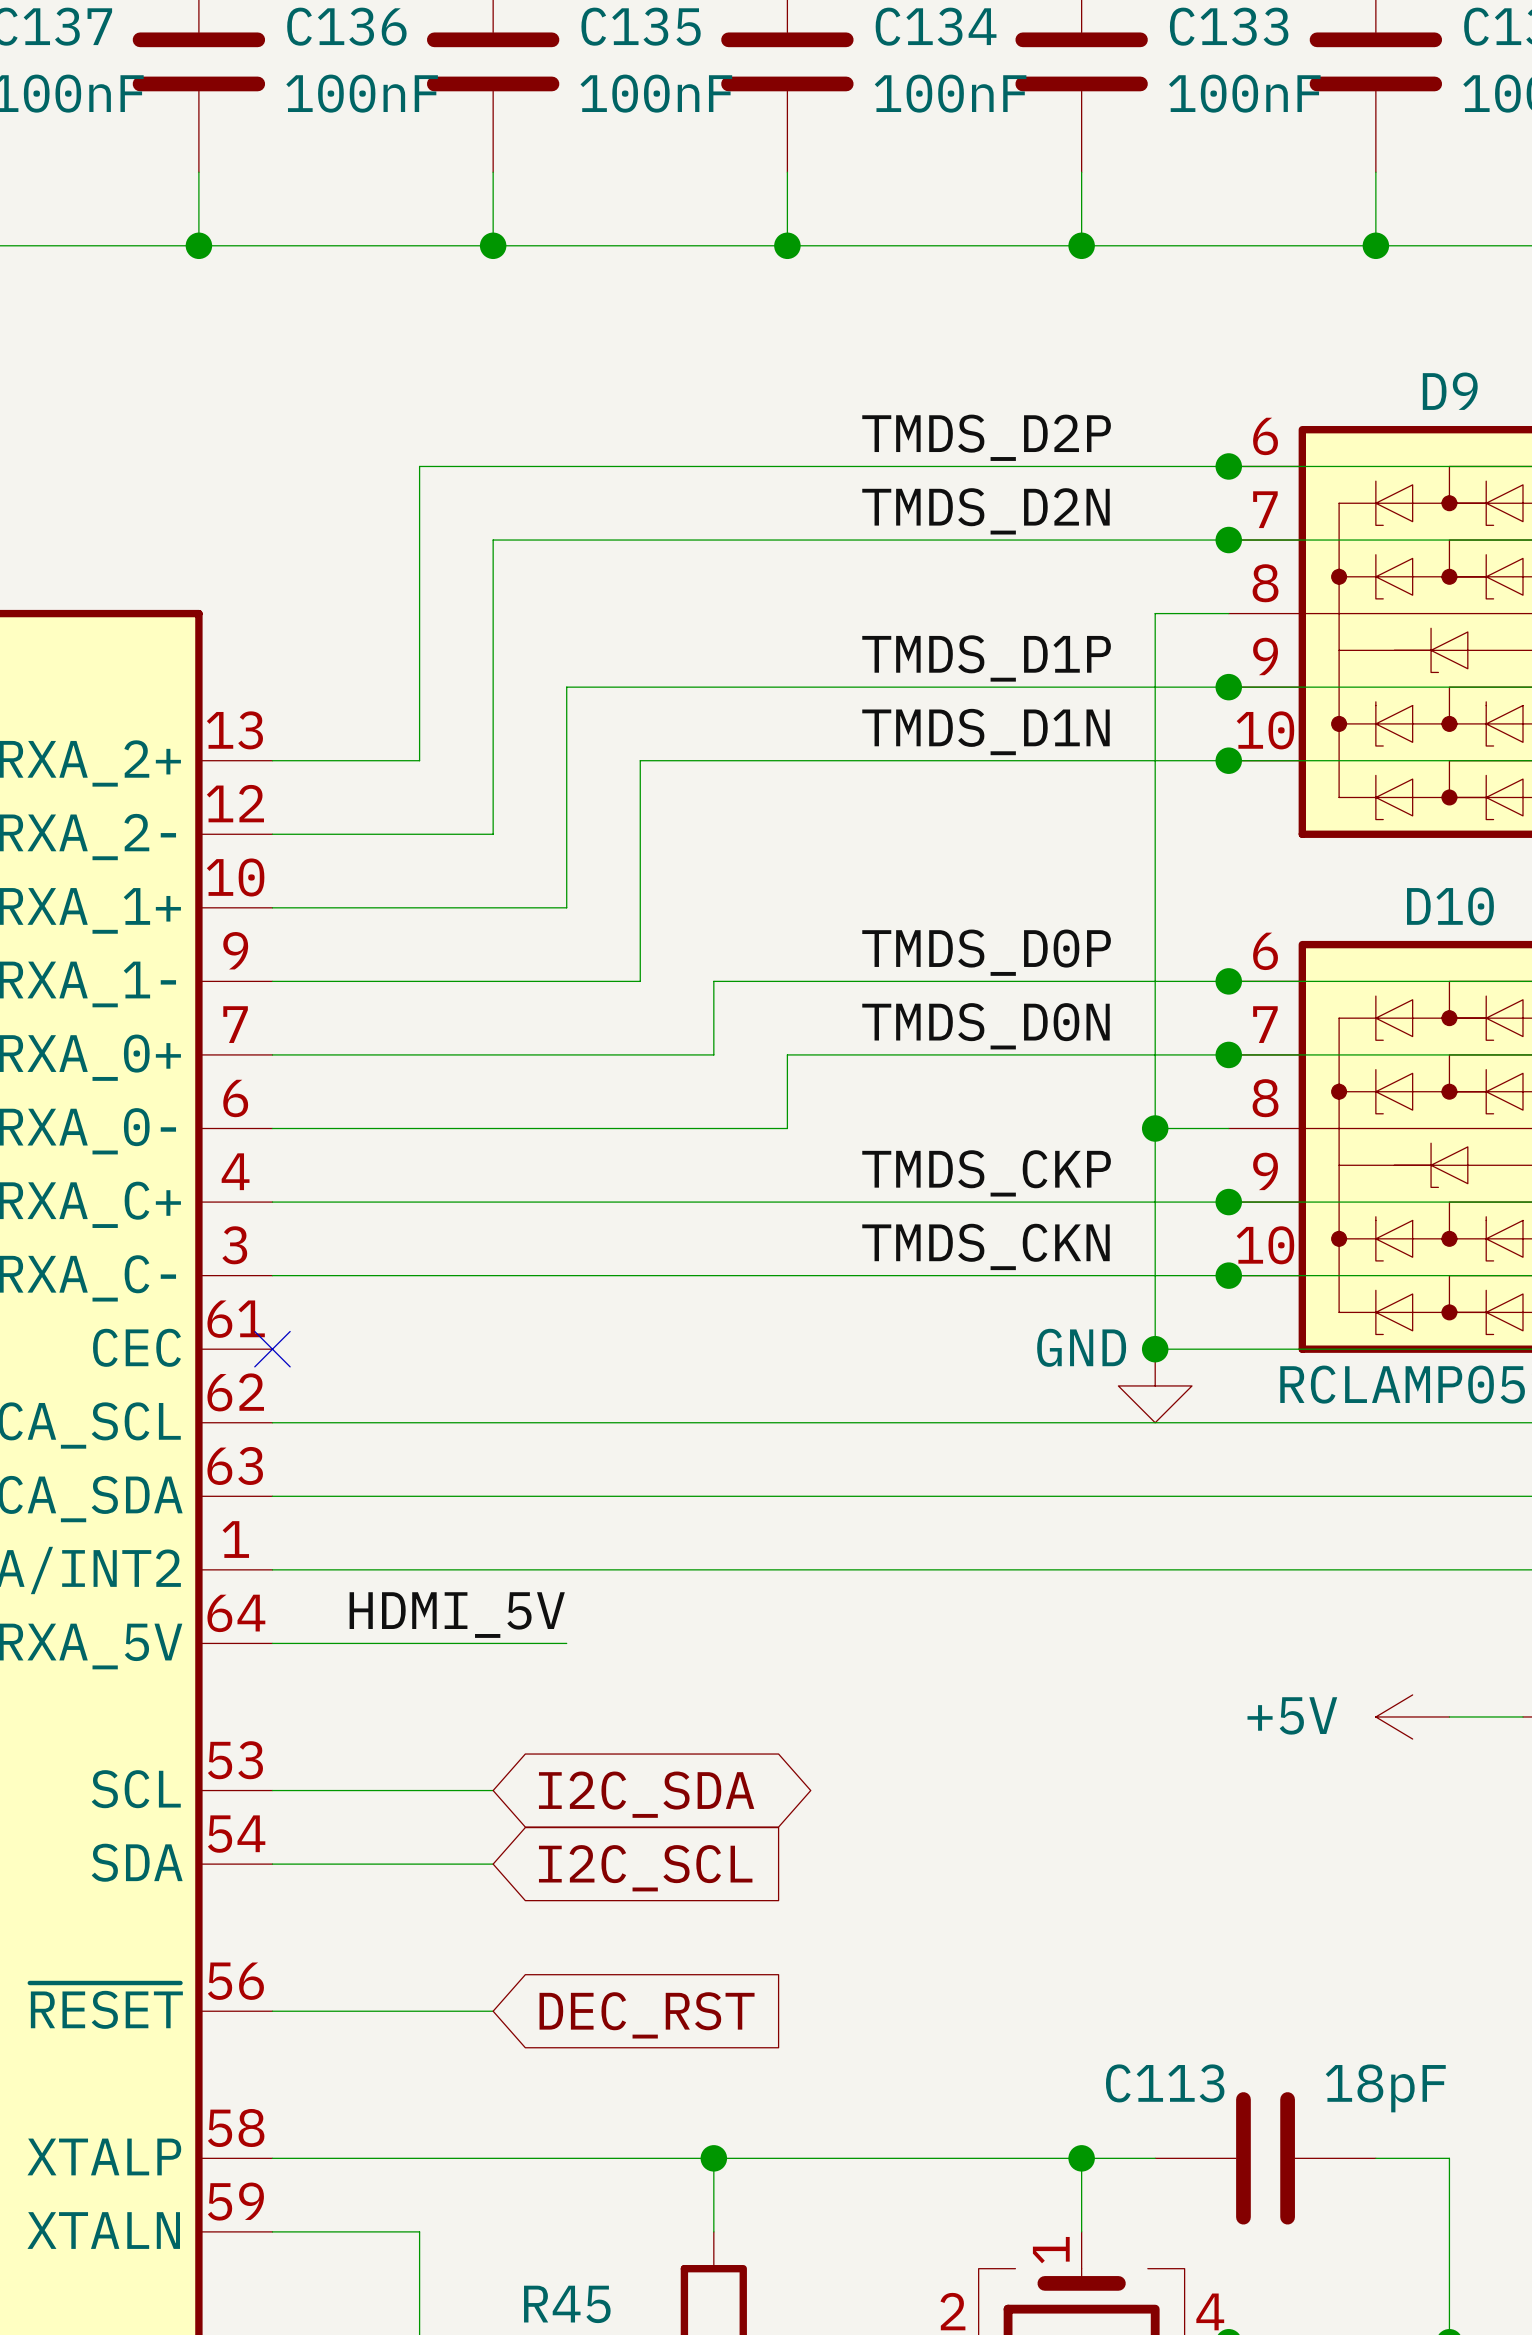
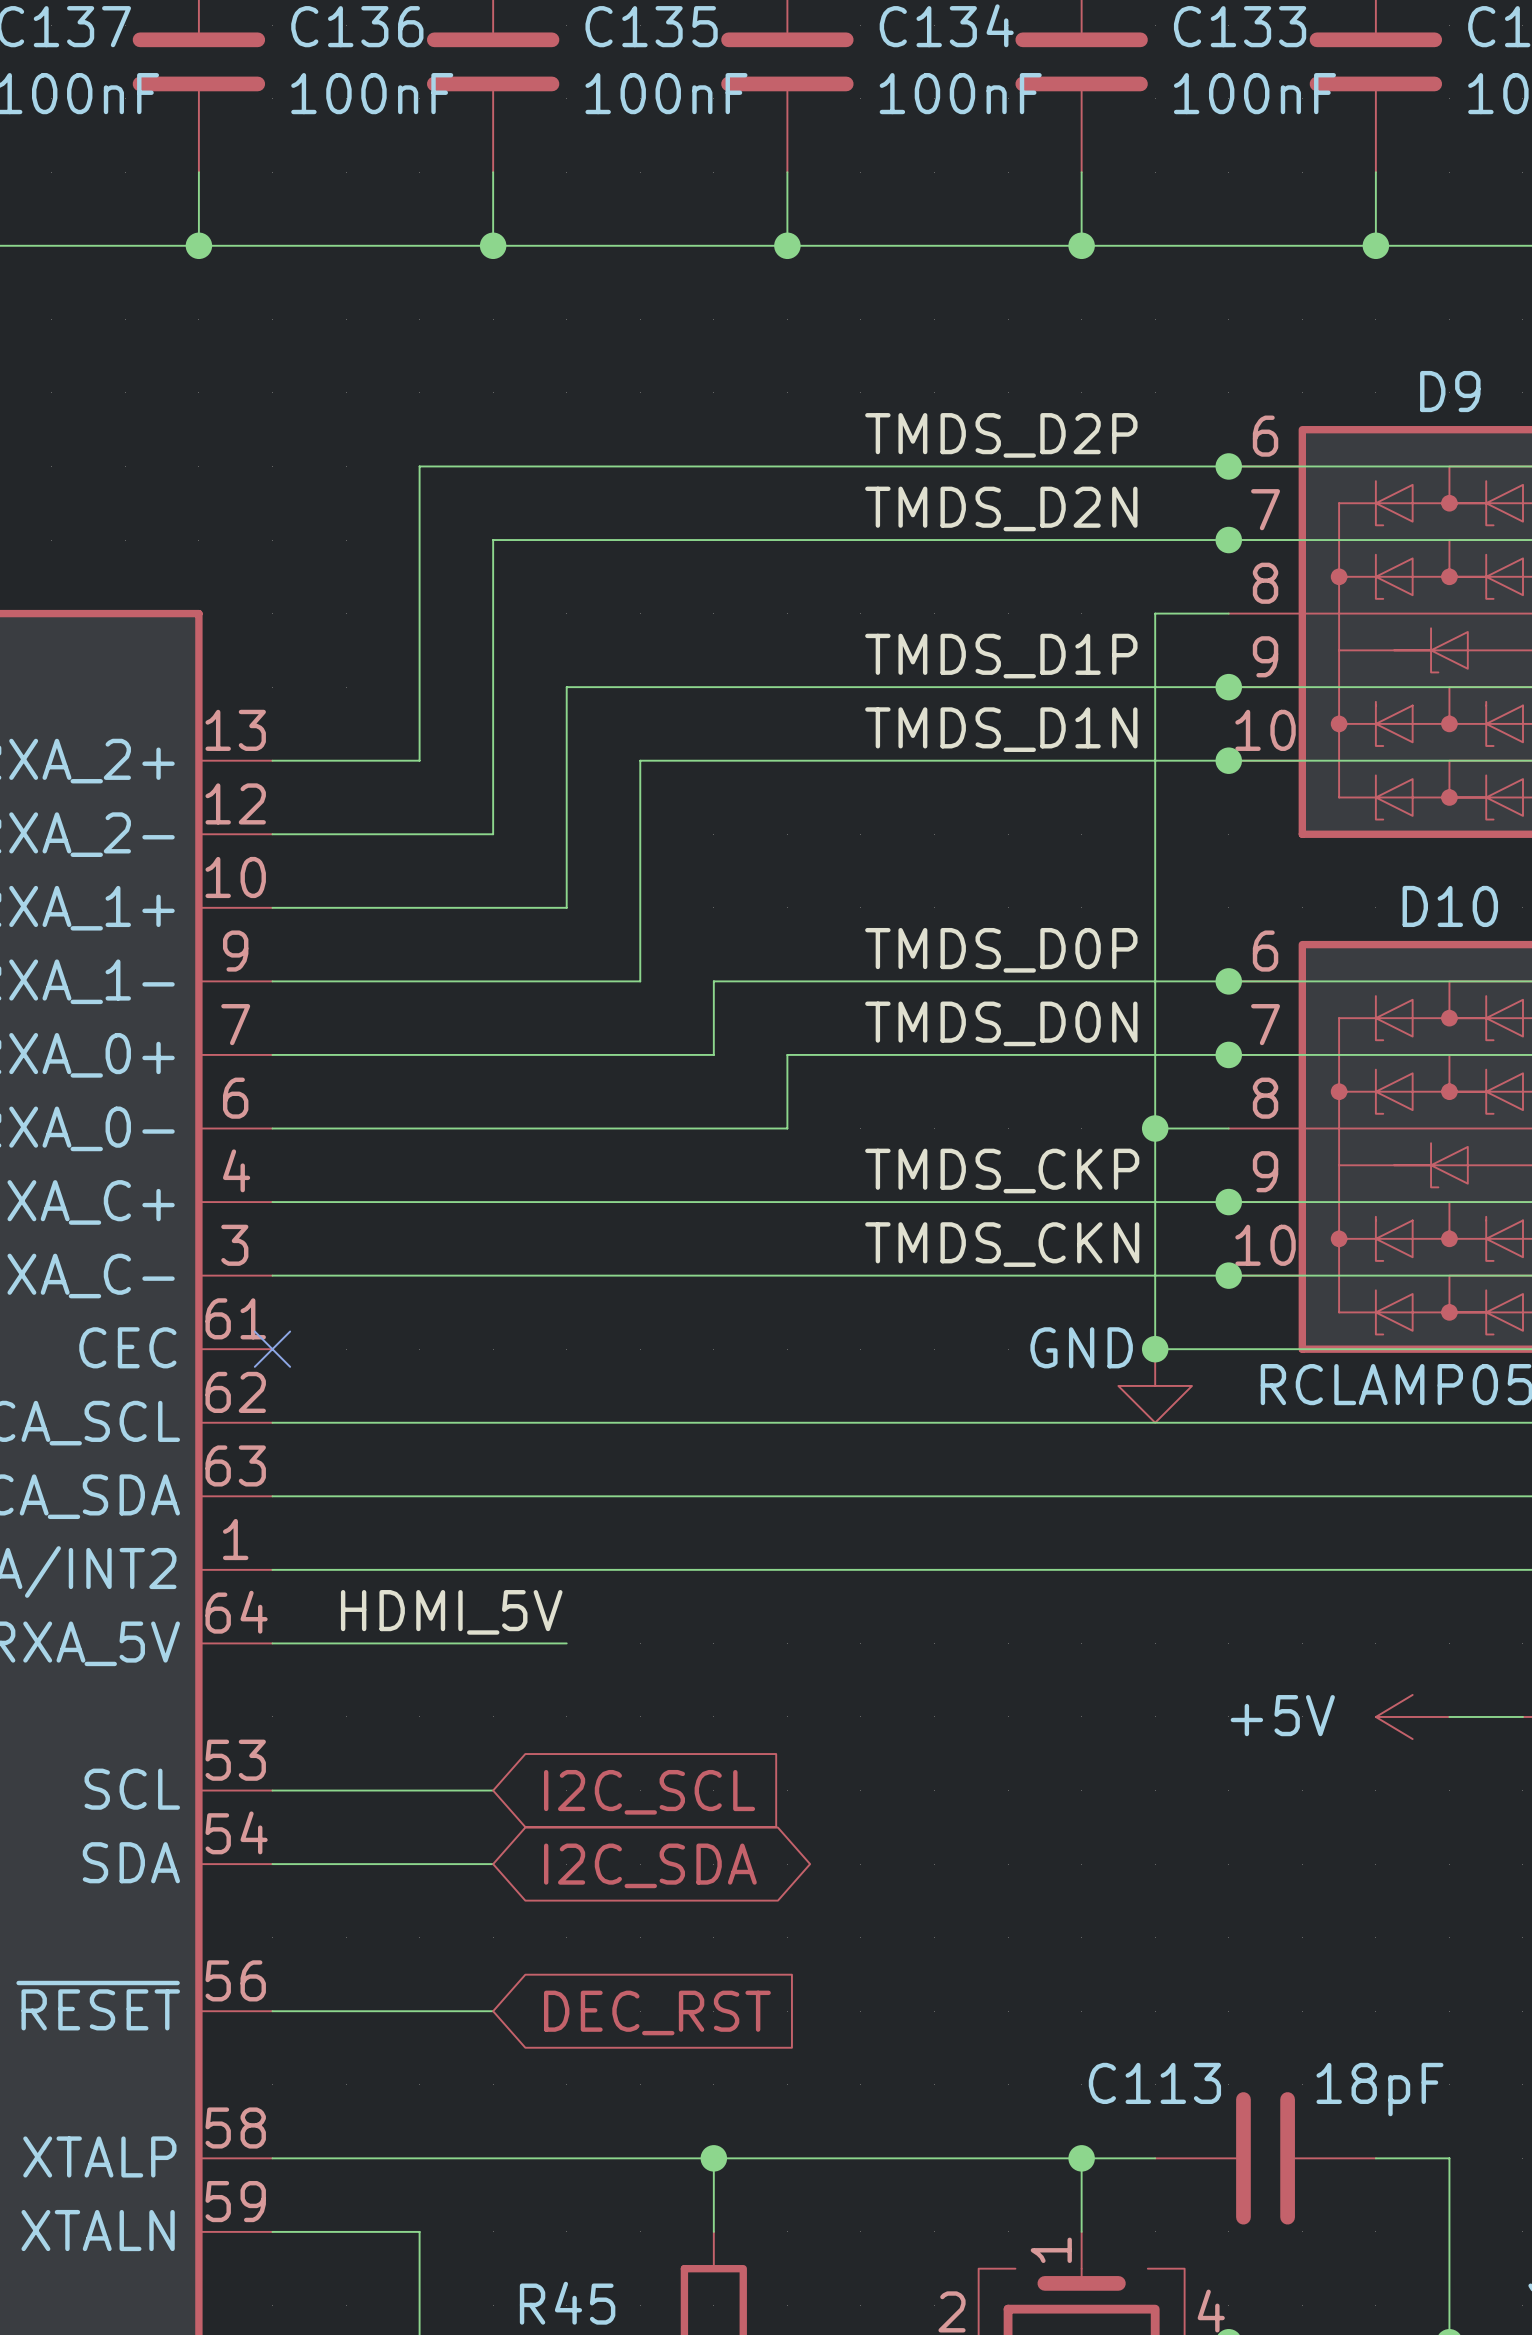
global label shape: bidirectional (646, 1794) -> input (649, 1792)
global label: I2C_SDA (646, 1794) -> I2C_SCL (649, 1792)
global label shape: input (645, 1868) -> bidirectional (650, 1865)
global label: I2C_SCL (645, 1868) -> I2C_SDA (650, 1865)

